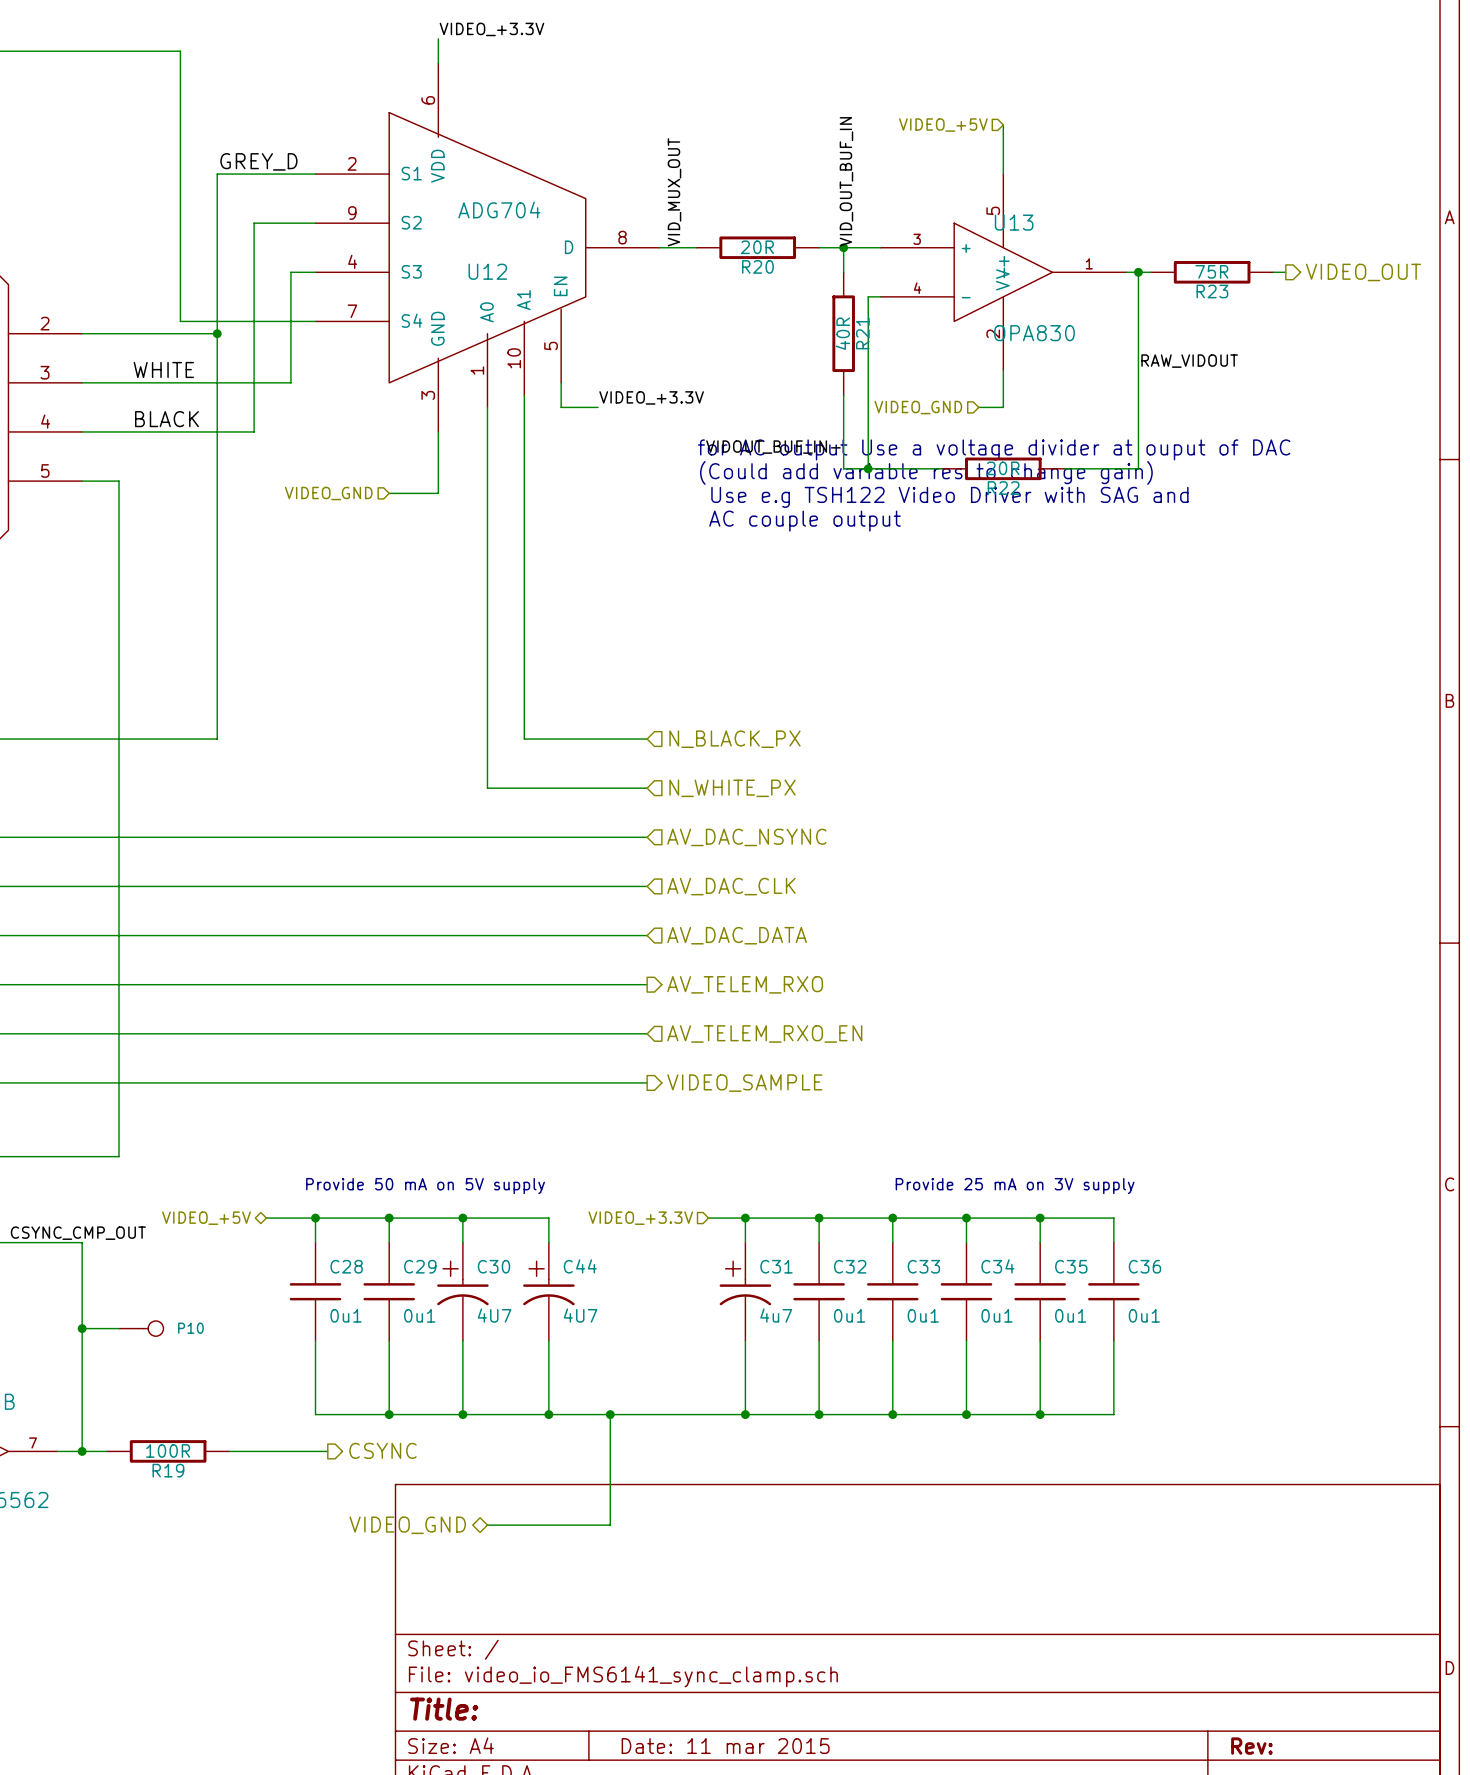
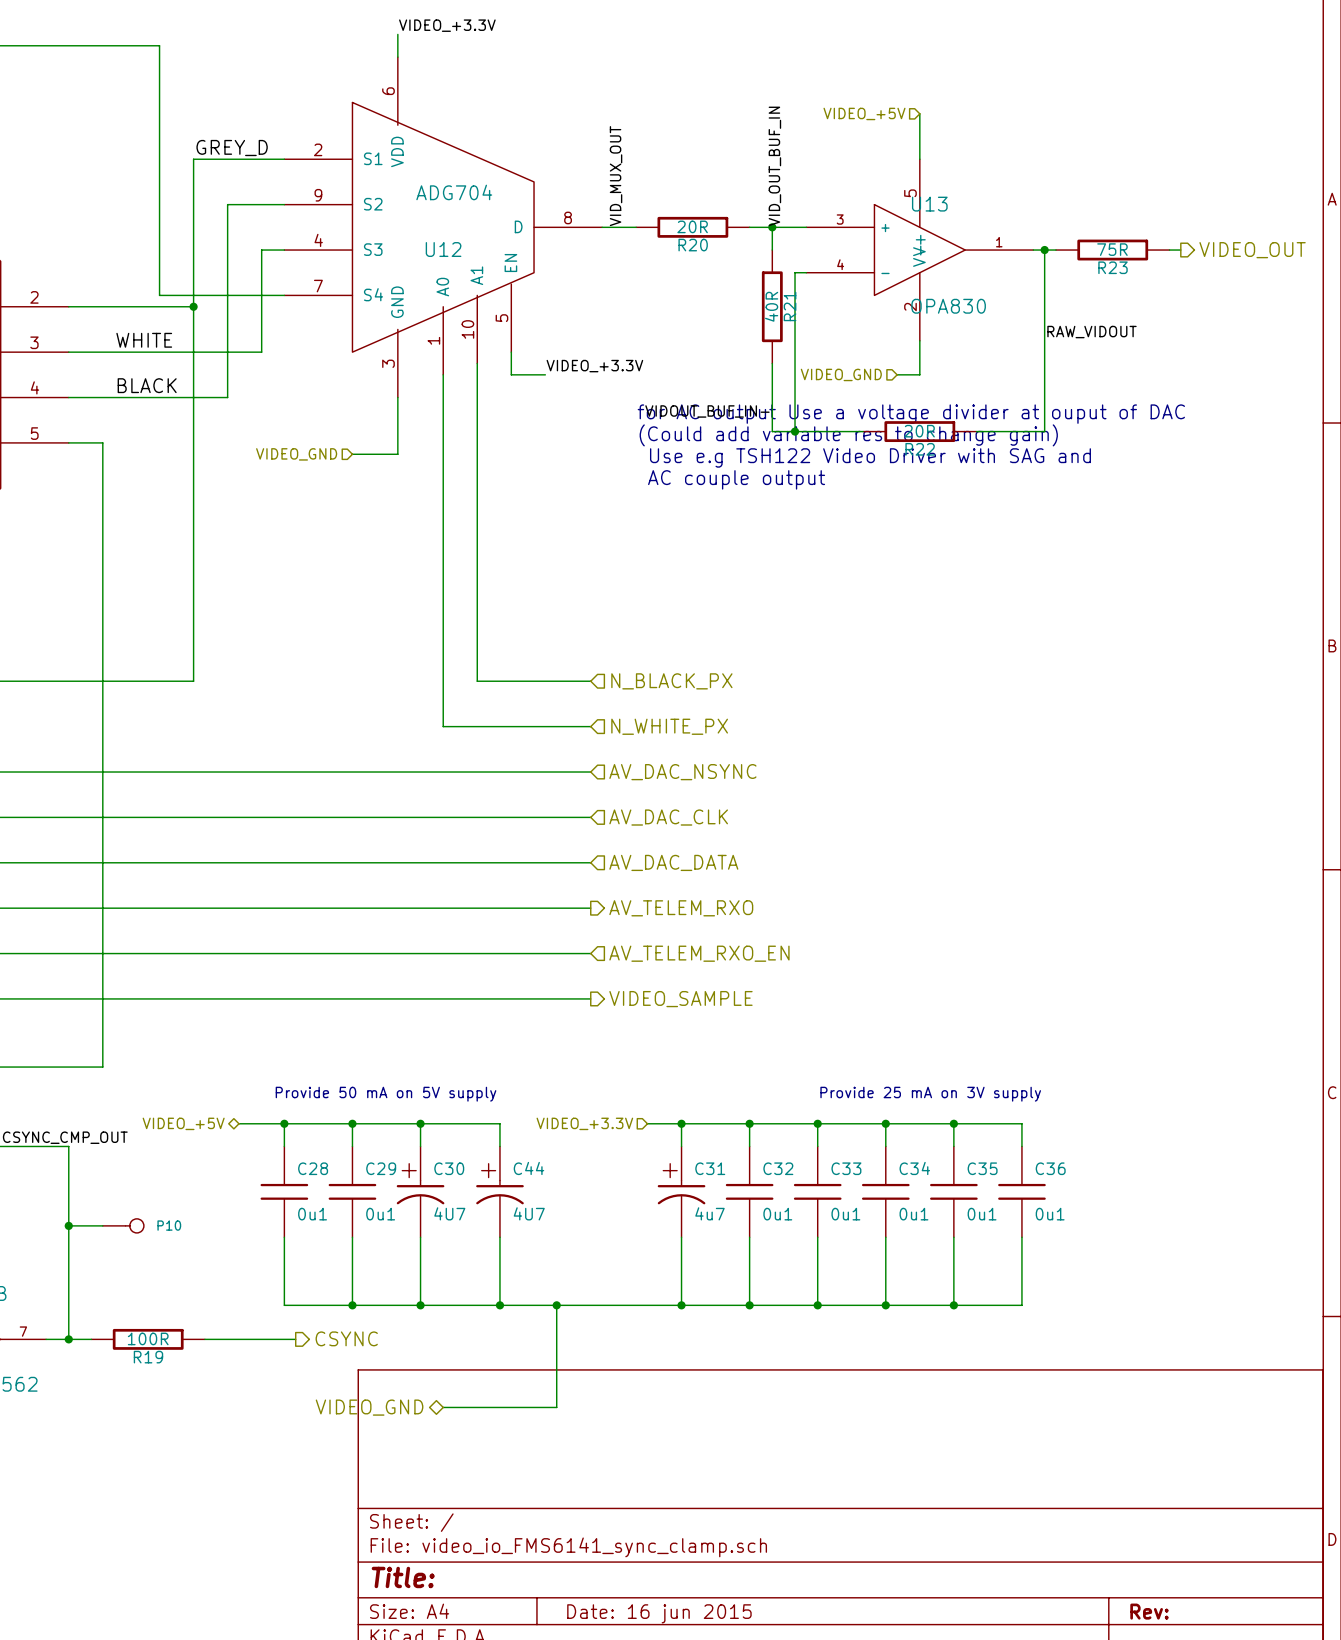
title block: Date: 11 mar 2015 (725, 1746) -> Date: 16 jun 2015 (659, 1613)

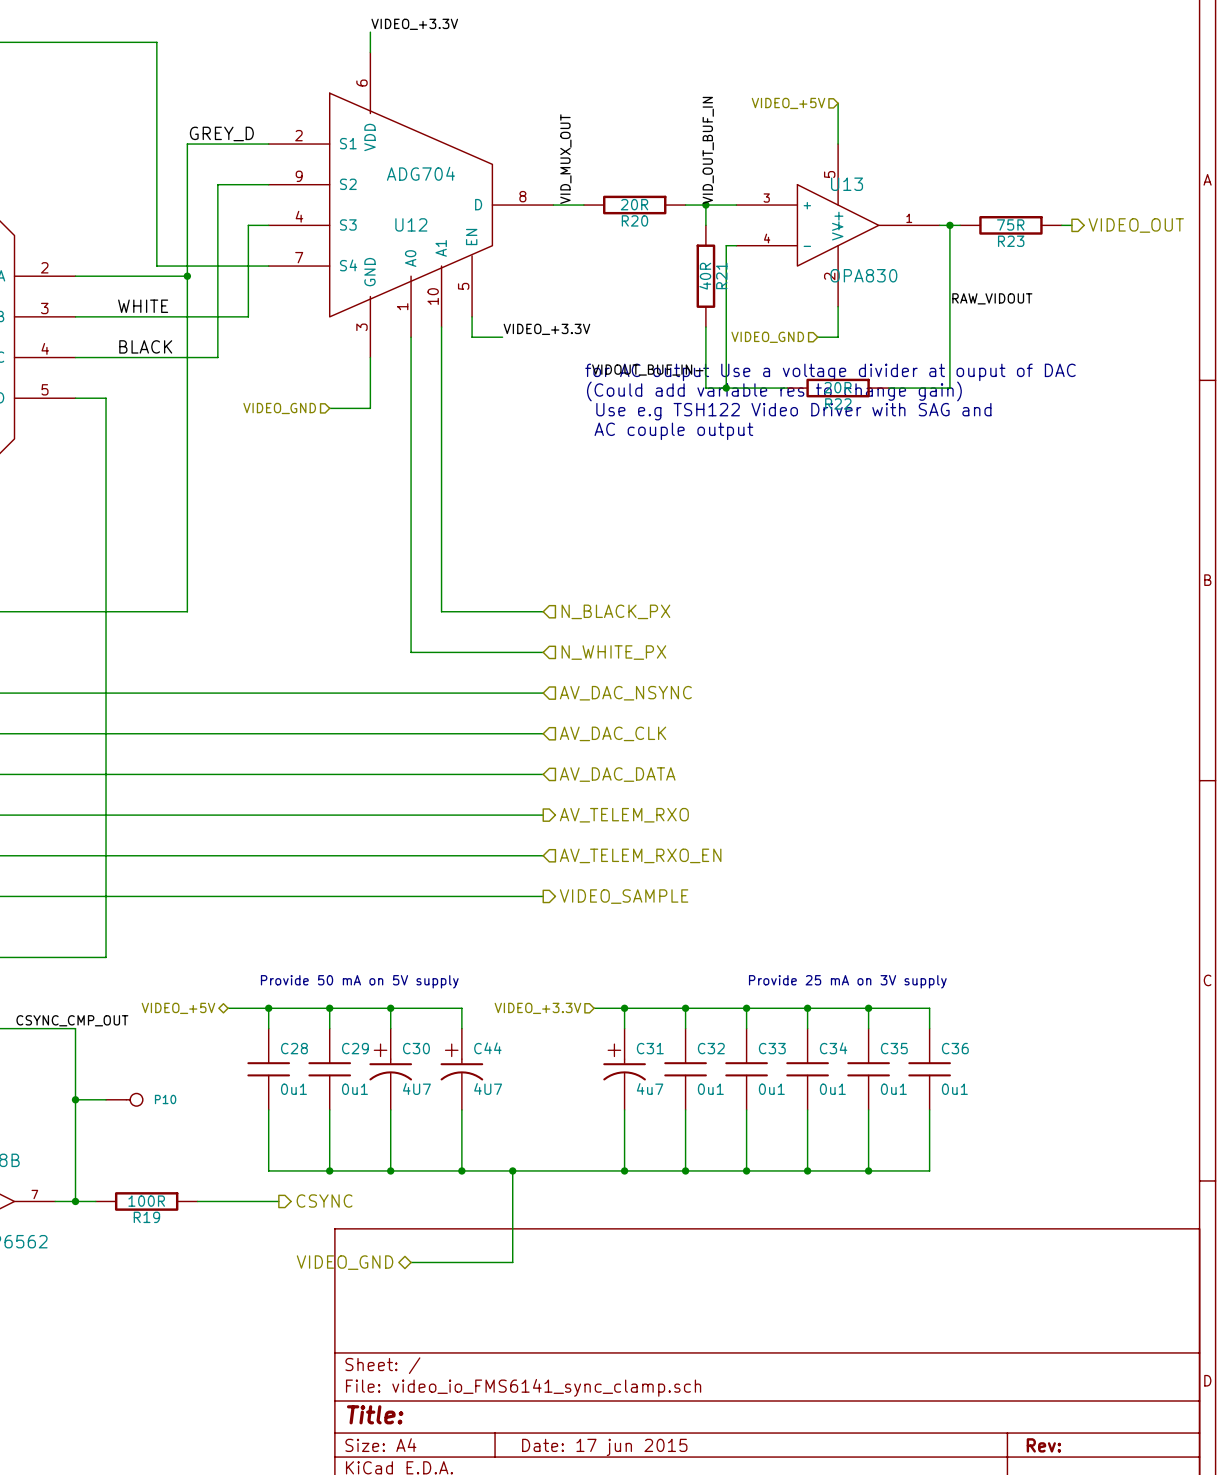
title block: Date: 16 jun 2015 (659, 1613) -> Date: 17 jun 2015 (604, 1447)

